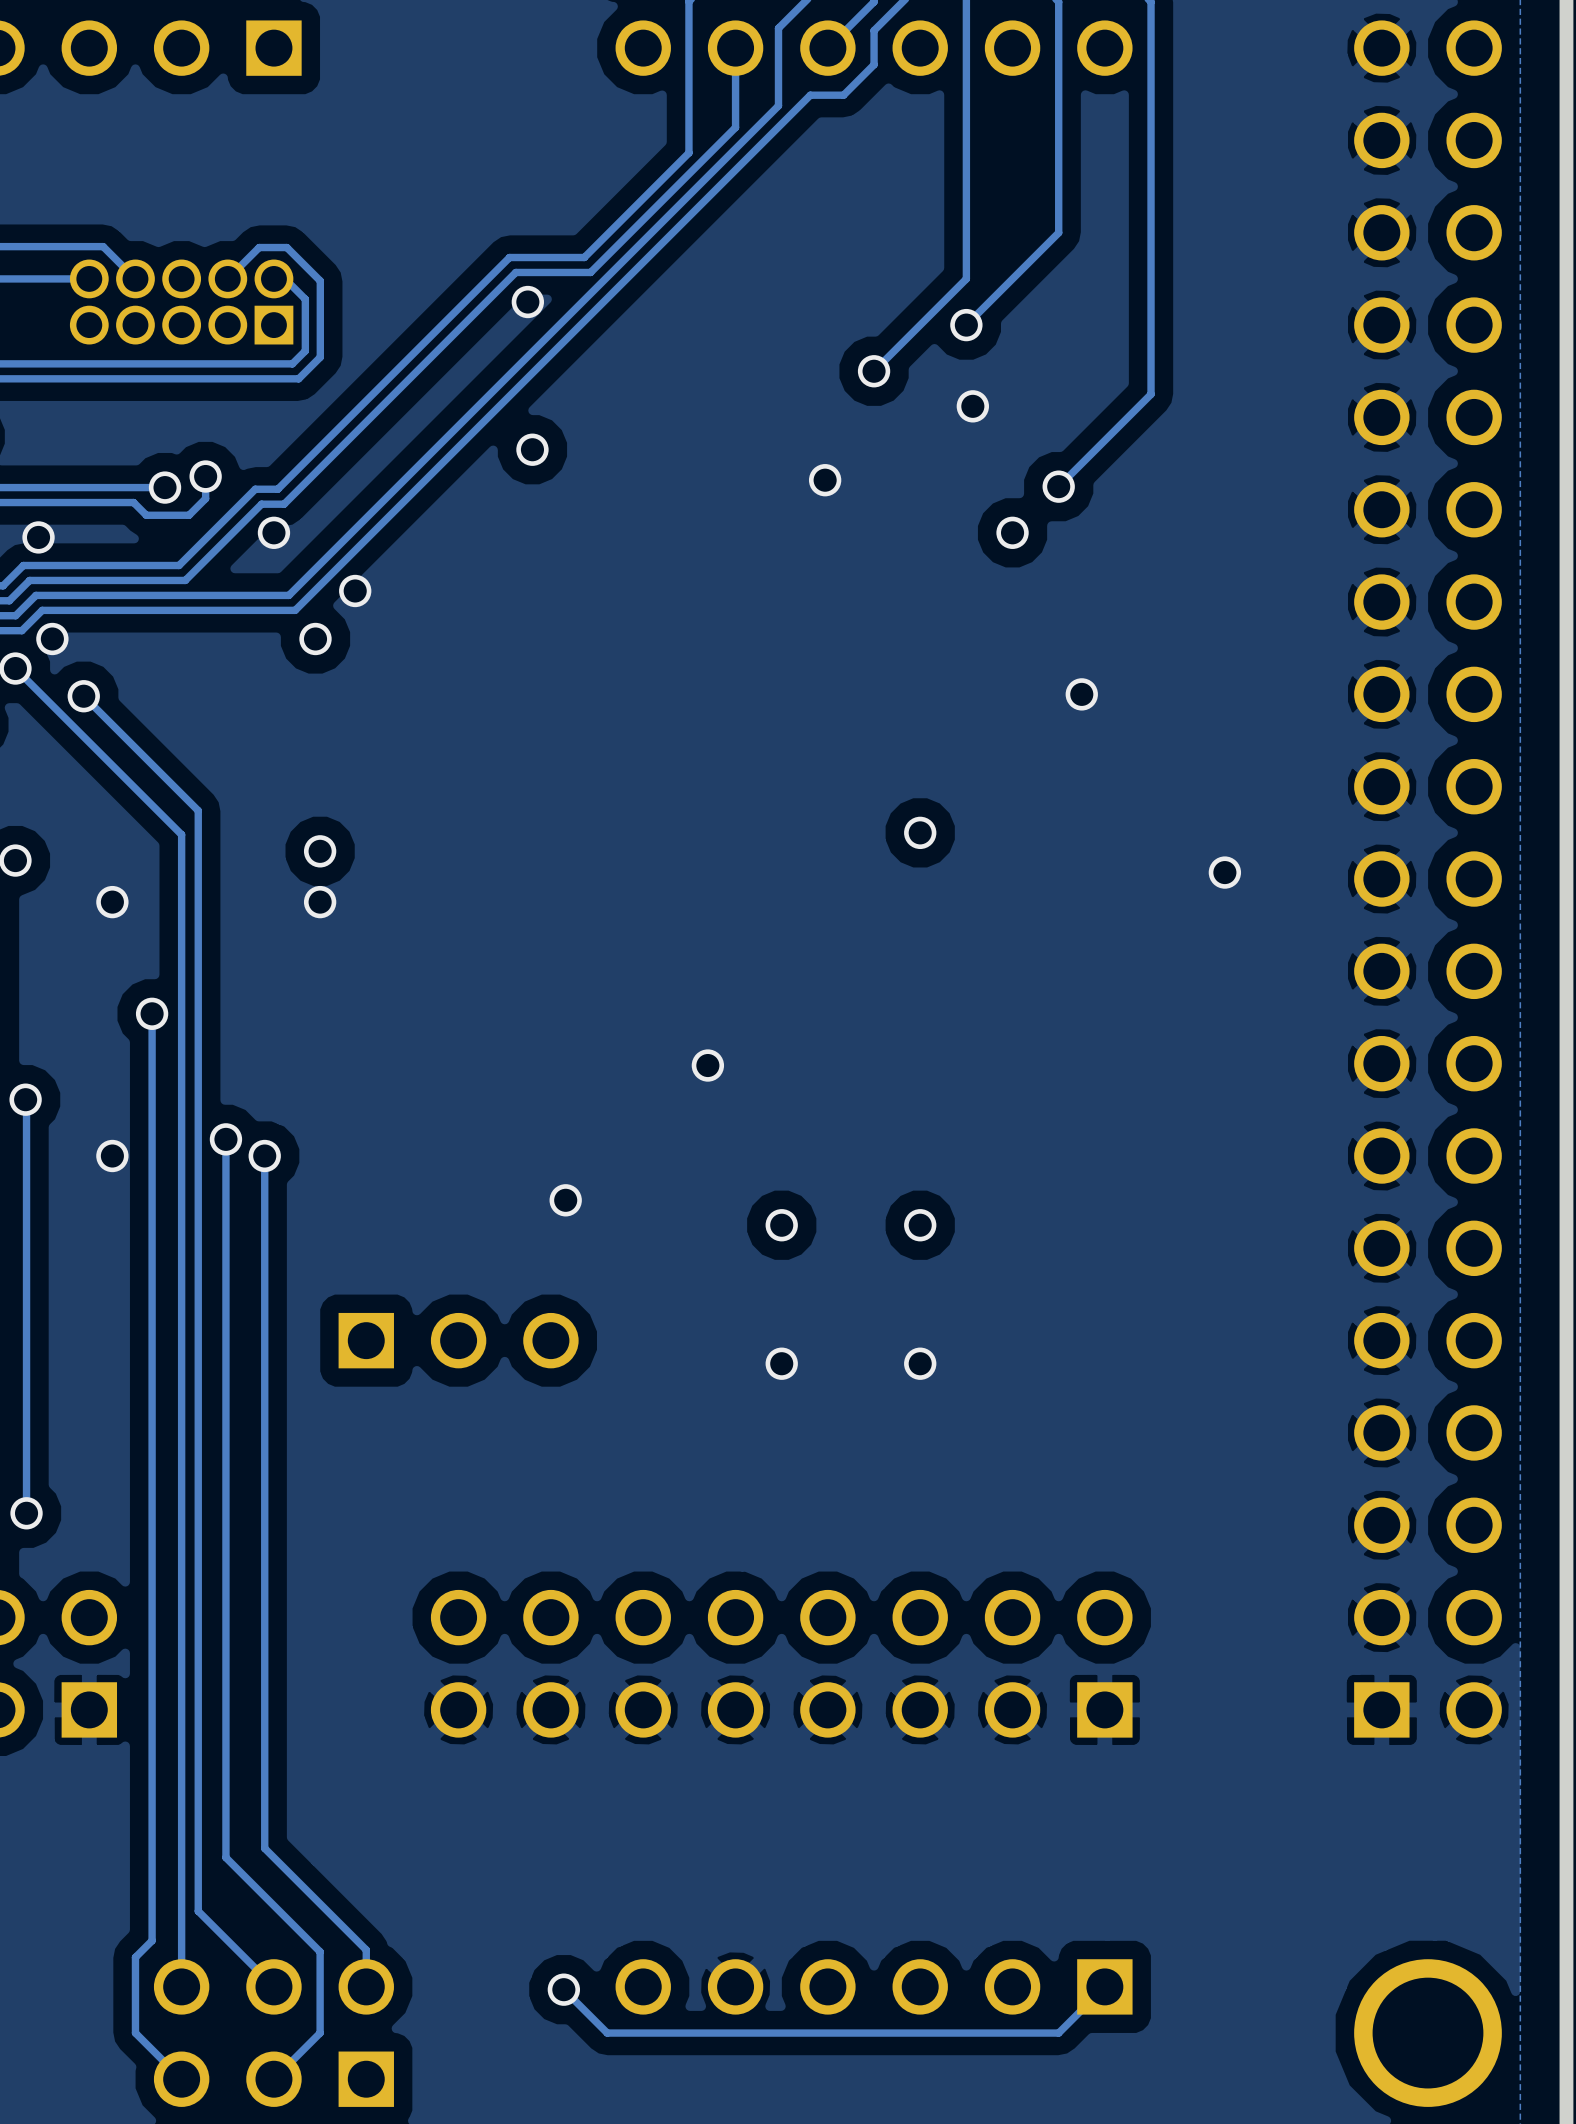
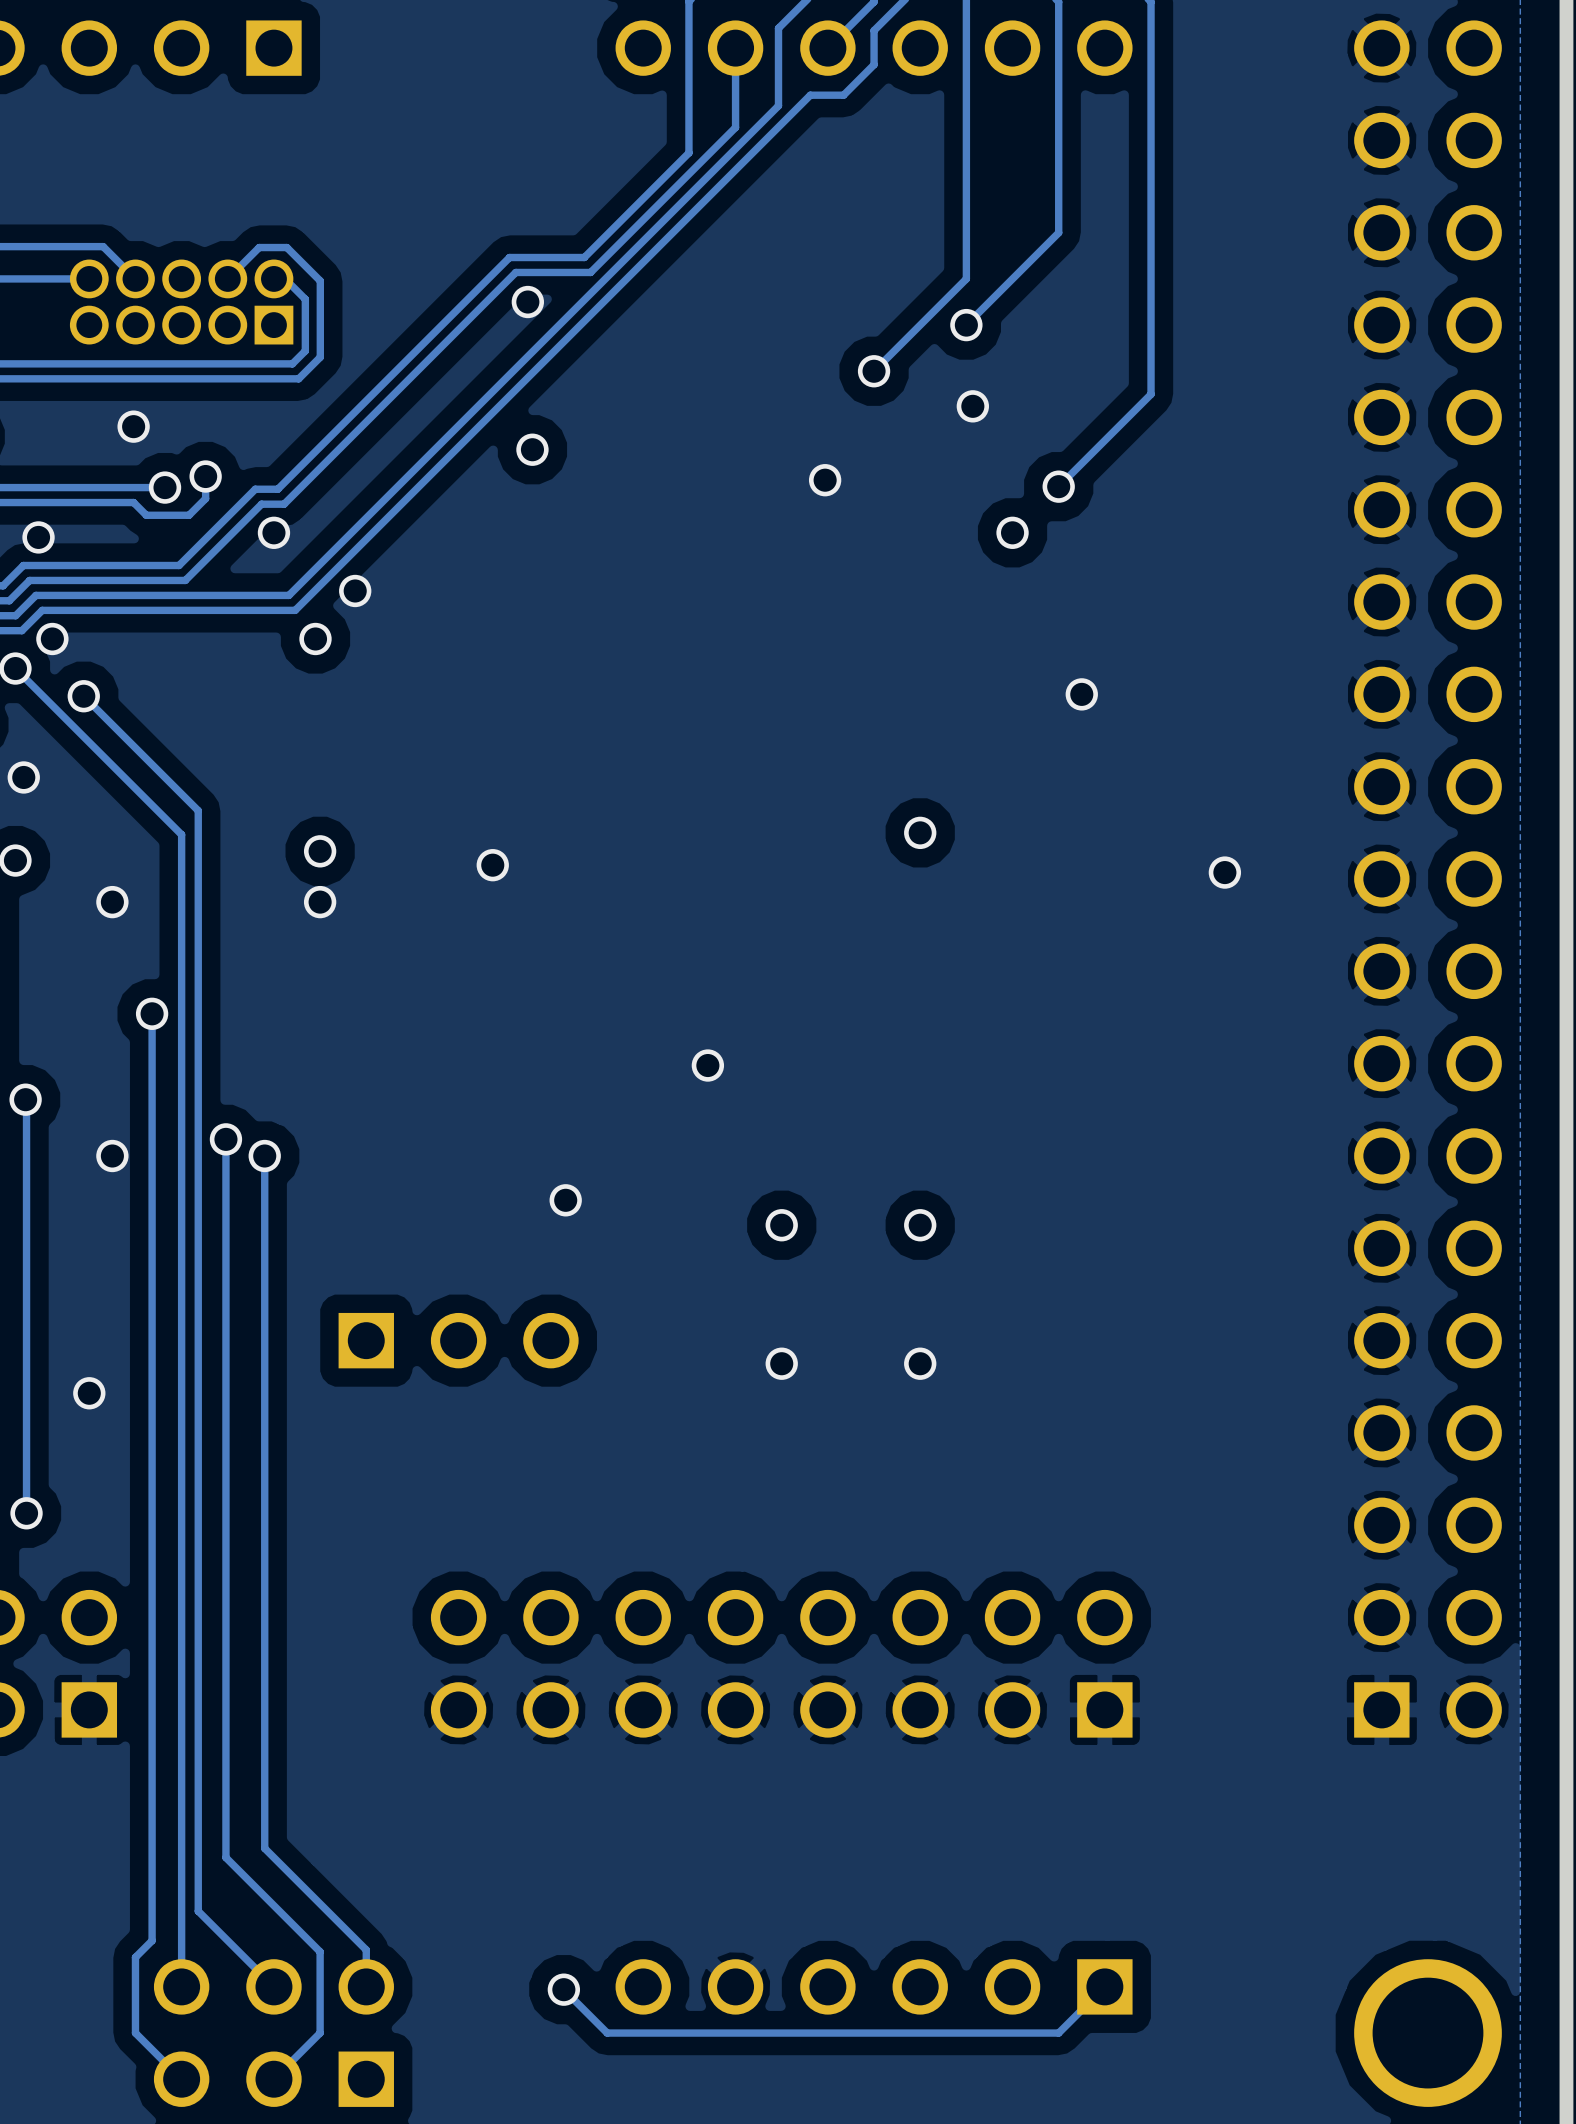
via: none -> (133, 426)
via: none -> (23, 777)
via: none -> (492, 865)
via: none -> (89, 1393)

